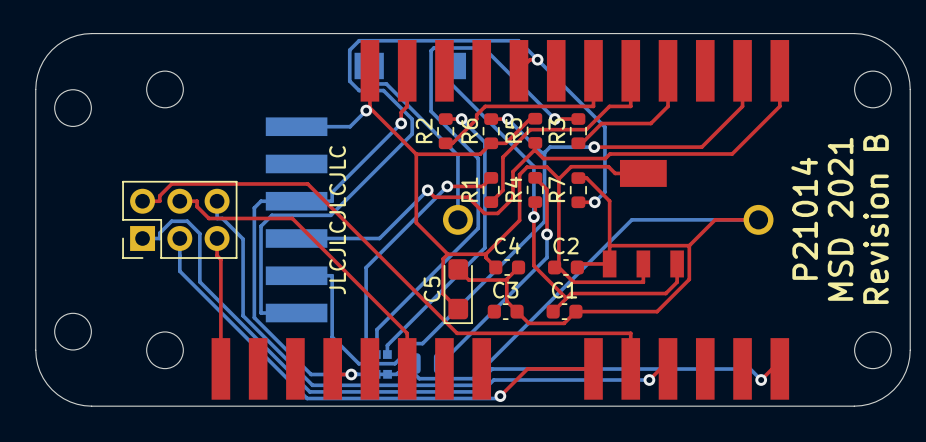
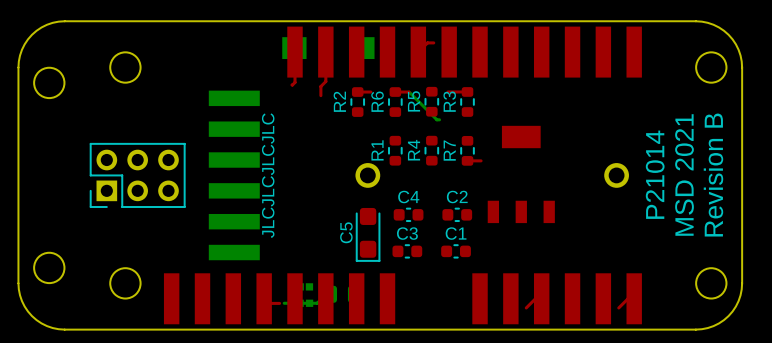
via: (537, 59) -> none
bottom track: (369, 65) (369, 83) (386, 83) (457, 155) (457, 219) -> none
bottom track: (451, 65) (451, 83) (533, 166) (533, 217) -> none
top track: (593, 70) (593, 106) (485, 106) (476, 114) (476, 119) (452, 143) (445, 143) -> none
top track: (630, 70) (630, 106) (609, 106) (586, 129) (530, 129) (502, 157) (502, 190) (491, 202) -> none
top track: (668, 70) (668, 106) (650, 123) (601, 123) (582, 143) (578, 143) -> none
top track: (742, 70) (742, 106) (701, 147) (594, 147) -> none
top track: (779, 70) (779, 106) (732, 154) (609, 154) (605, 158) (543, 158) (535, 150) -> none
top track: (369, 107) (416, 154) -> none
bottom track: (366, 110) (350, 126) (296, 126) -> none
via: (366, 110) -> none
top track: (535, 118) (530, 118) (505, 143) (491, 143) (480, 154) (416, 154) -> none
bottom track: (461, 119) (484, 142) (484, 247) (387, 345) (387, 354) -> none
via: (461, 119) -> none
via: (507, 119) -> none
bottom track: (554, 119) (483, 48) (433, 48) (431, 50) (431, 111) (478, 158) (478, 228) (376, 329) (376, 354) -> none
via: (554, 119) -> none
bottom track: (401, 123) (332, 192) (332, 201) (261, 201) (254, 207) (254, 317) (311, 374) (356, 374) -> none
via: (401, 123) -> none
bottom track: (594, 147) (550, 147) (544, 152) (544, 221) (422, 343) (411, 343) (394, 363) (358, 363) (332, 337) (332, 275) (296, 275) -> none
via: (594, 147) -> none
top track: (535, 150) (512, 171) (512, 198) (497, 213) (484, 213) (468, 197) (434, 197) (427, 190) -> none
top track: (416, 154) (416, 222) (447, 254) -> none
top track: (643, 173) (615, 173) (608, 166) (571, 166) (558, 179) -> none
top track: (491, 177) (482, 186) (447, 186) -> none
top track: (535, 177) (547, 189) (547, 234) -> none
top track: (578, 178) (586, 178) (609, 201) (609, 263) (580, 263) (577, 267) -> none
top track: (558, 179) (547, 167) (527, 167) (519, 174) (519, 220) (485, 254) -> none
top track: (558, 179) (558, 263) (554, 267) -> none
bottom track: (447, 186) (366, 267) (366, 354) -> none
via: (447, 186) -> none
bottom track: (427, 190) (379, 238) (296, 238) -> none
via: (427, 190) -> none
top track: (142, 201) (159, 201) (159, 195) (171, 183) (307, 183) (457, 333) (630, 333) (630, 368) -> none
top track: (179, 201) (197, 201) (197, 206) (208, 218) (292, 218) (407, 333) (407, 368) -> none
bottom track: (217, 201) (217, 218) (222, 218) (243, 239) (243, 315) (312, 385) (475, 385) (492, 369) (750, 369) (761, 380) -> none
top track: (535, 202) (533, 265) (566, 298) -> none
bottom track: (594, 202) (604, 192) (604, 127) (518, 40) (359, 40) (349, 50) (349, 81) (359, 90) (383, 90) (412, 119) (412, 133) (330, 215) (271, 215) (261, 226) (261, 313) (296, 313) -> none
via: (594, 202) -> none
via: (533, 217) -> none
top track: (758, 219) (715, 219) (689, 245) -> none
bottom track: (758, 219) (631, 219) (473, 378) (419, 378) (413, 372) (413, 363) -> none
bottom track: (547, 234) (547, 257) (441, 363) -> none
via: (547, 234) -> none
bottom track: (142, 238) (159, 238) (159, 233) (171, 221) (187, 221) (199, 233) (199, 281) (309, 391) (481, 391) (493, 380) (649, 380) -> none
bottom track: (179, 238) (179, 271) (307, 398) (497, 398) (500, 396) -> none
top track: (217, 238) (217, 255) (220, 259) (220, 368) -> none
top track: (609, 245) (689, 245) -> none
top track: (689, 245) (689, 279) (657, 311) (575, 311) (564, 323) (528, 323) (506, 301) (506, 279) (518, 267) -> none
top track: (447, 254) (443, 258) (443, 293) (458, 309) -> none
top track: (447, 254) (485, 254) -> none
top track: (485, 254) (485, 257) (495, 267) -> none
top track: (643, 263) (643, 282) (573, 282) (556, 265) -> none
top track: (677, 263) (677, 282) (665, 293) (571, 293) (553, 311) -> none
top track: (458, 269) (468, 280) (506, 280) -> none
top track: (593, 368) (527, 368) (500, 396) -> none
via: (351, 374) -> none
via: (649, 380) -> none
via: (761, 380) -> none
via: (500, 396) -> none

